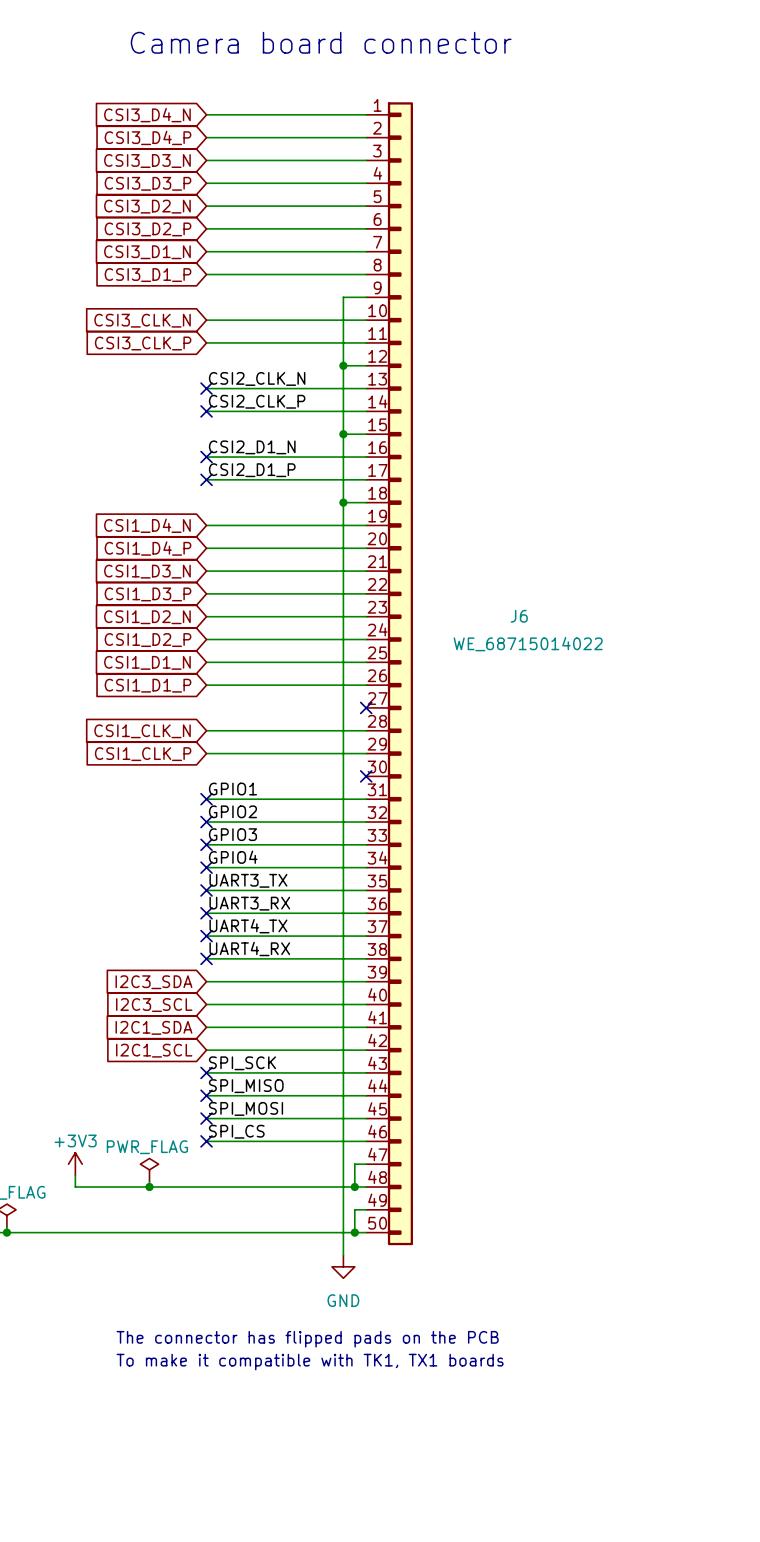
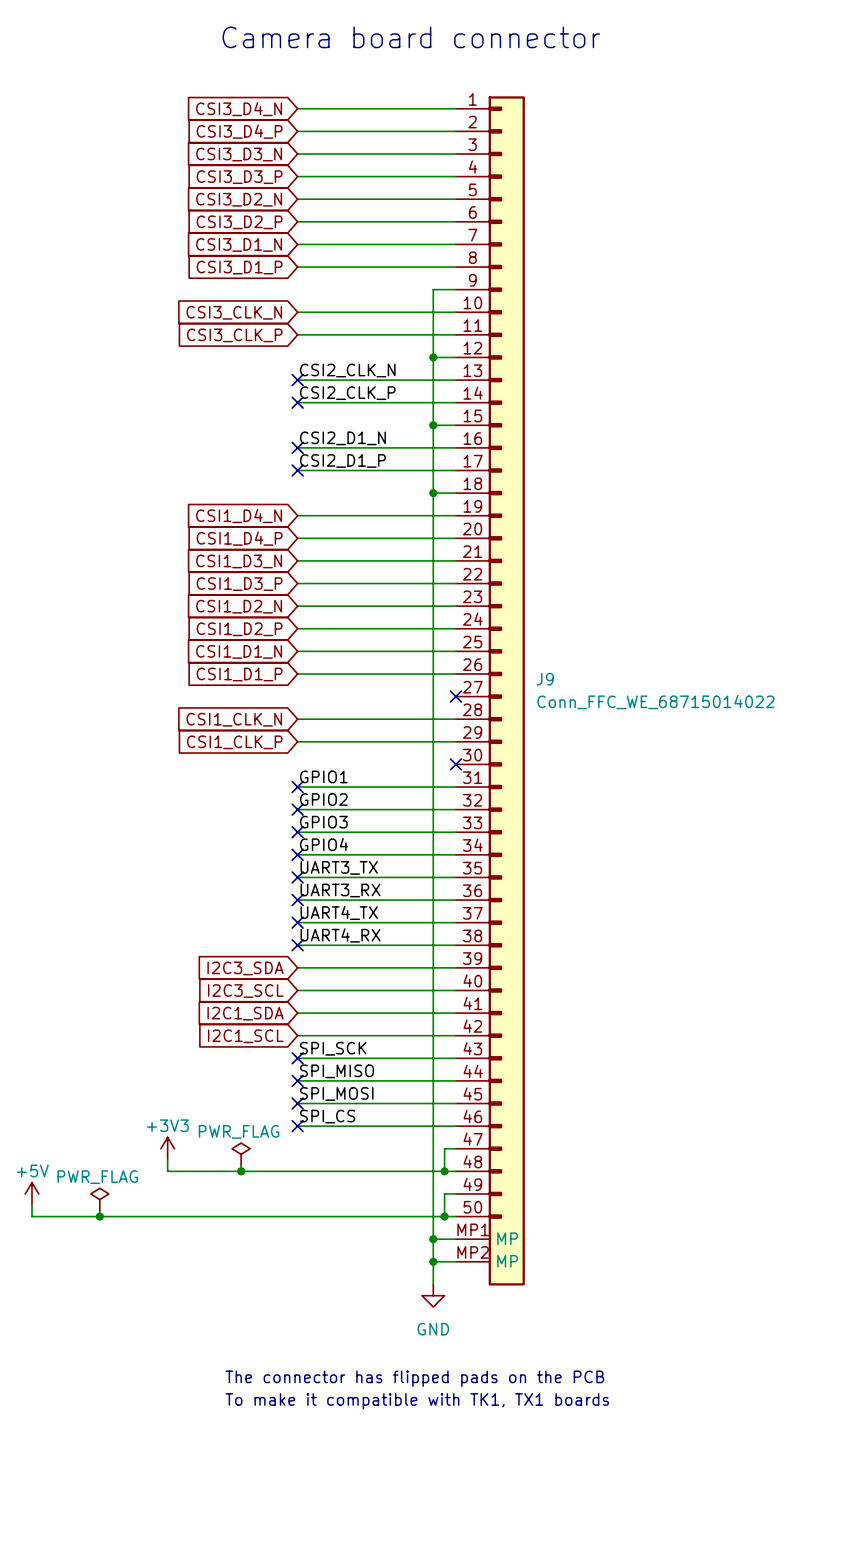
J6: WE_68715014022 (389, 673) -> none
J9: none -> Conn_FFC_WE_68715014022 (490, 690)
junction: none -> (433, 1239)
wire: none -> (455, 1239) (433, 1239) (433, 1284)
power symbol position: GND (343, 1266) -> GND (433, 1295)
wire: none -> (433, 1261) (455, 1261)
junction: none -> (433, 1261)
text position: The connector has flipped pads on the PCB (307, 1339) -> The connector has flipped pads on the PCB (414, 1378)
text position: To make it compatible with TK1, TX1 boards (310, 1362) -> To make it compatible with TK1, TX1 boards (417, 1401)

